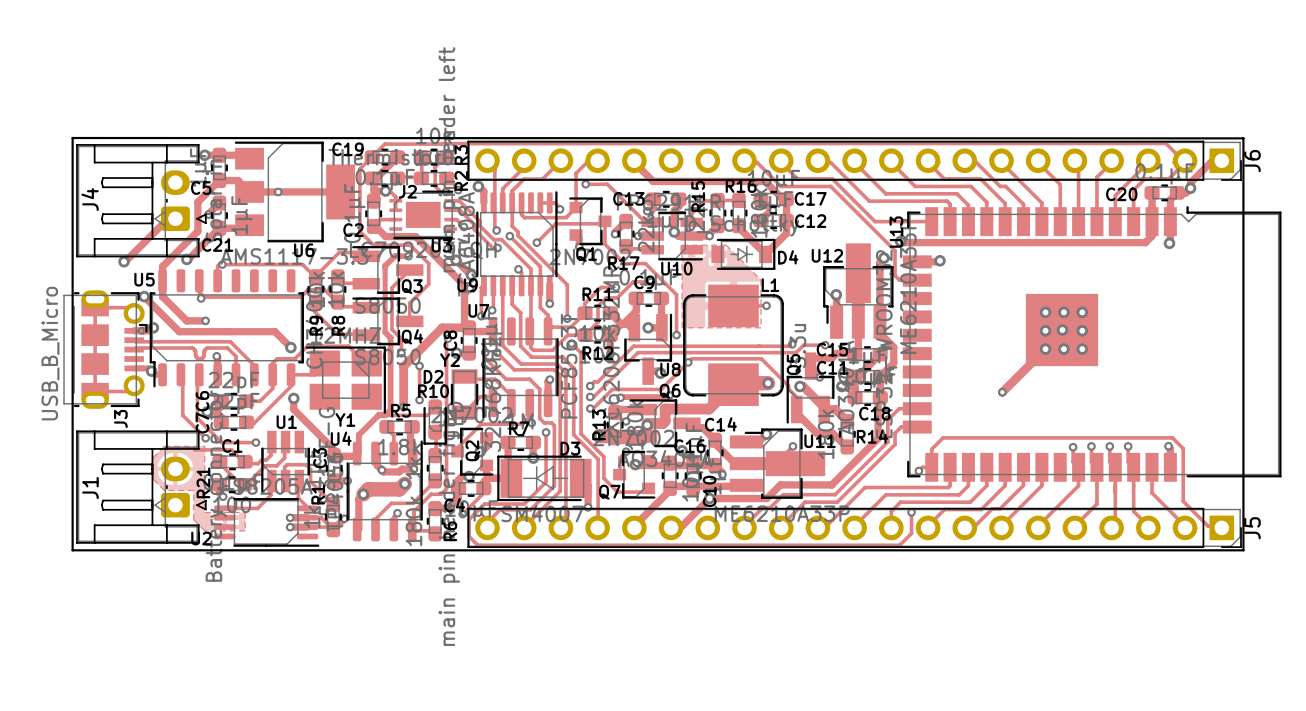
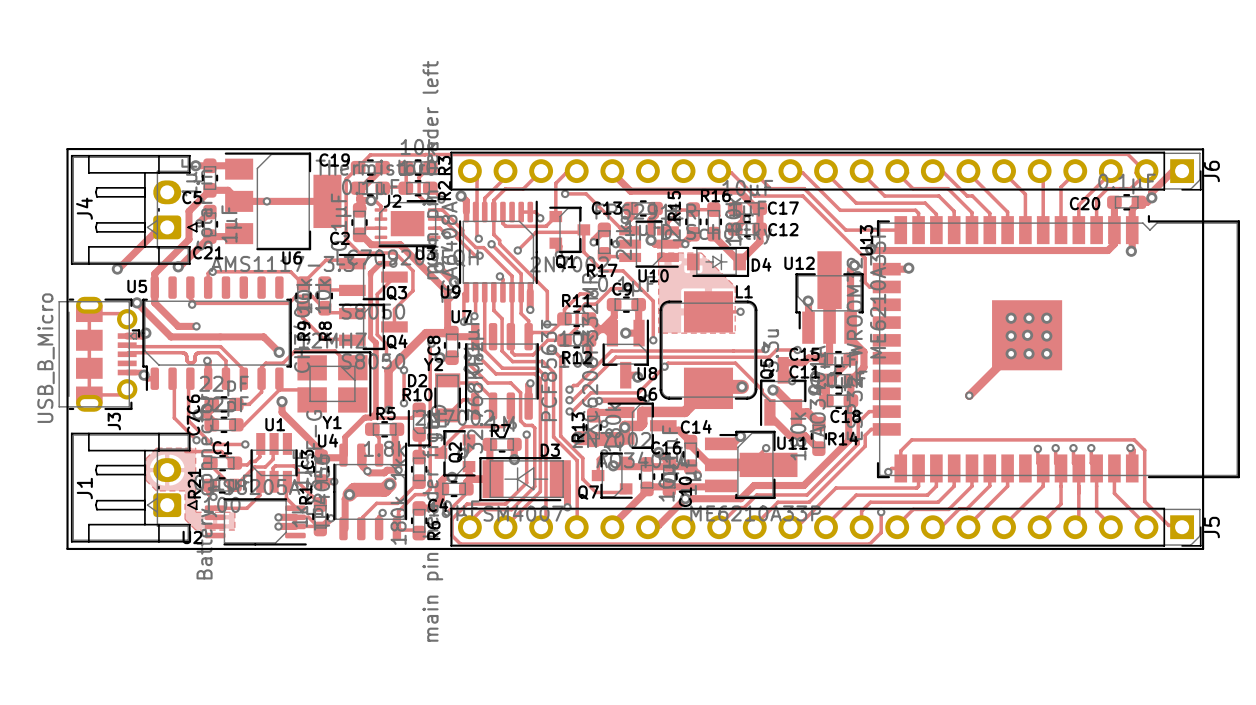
track: (325, 364) (314, 374) (291, 374) -> none
track: none -> (279, 389) (302, 389) (312, 399)

